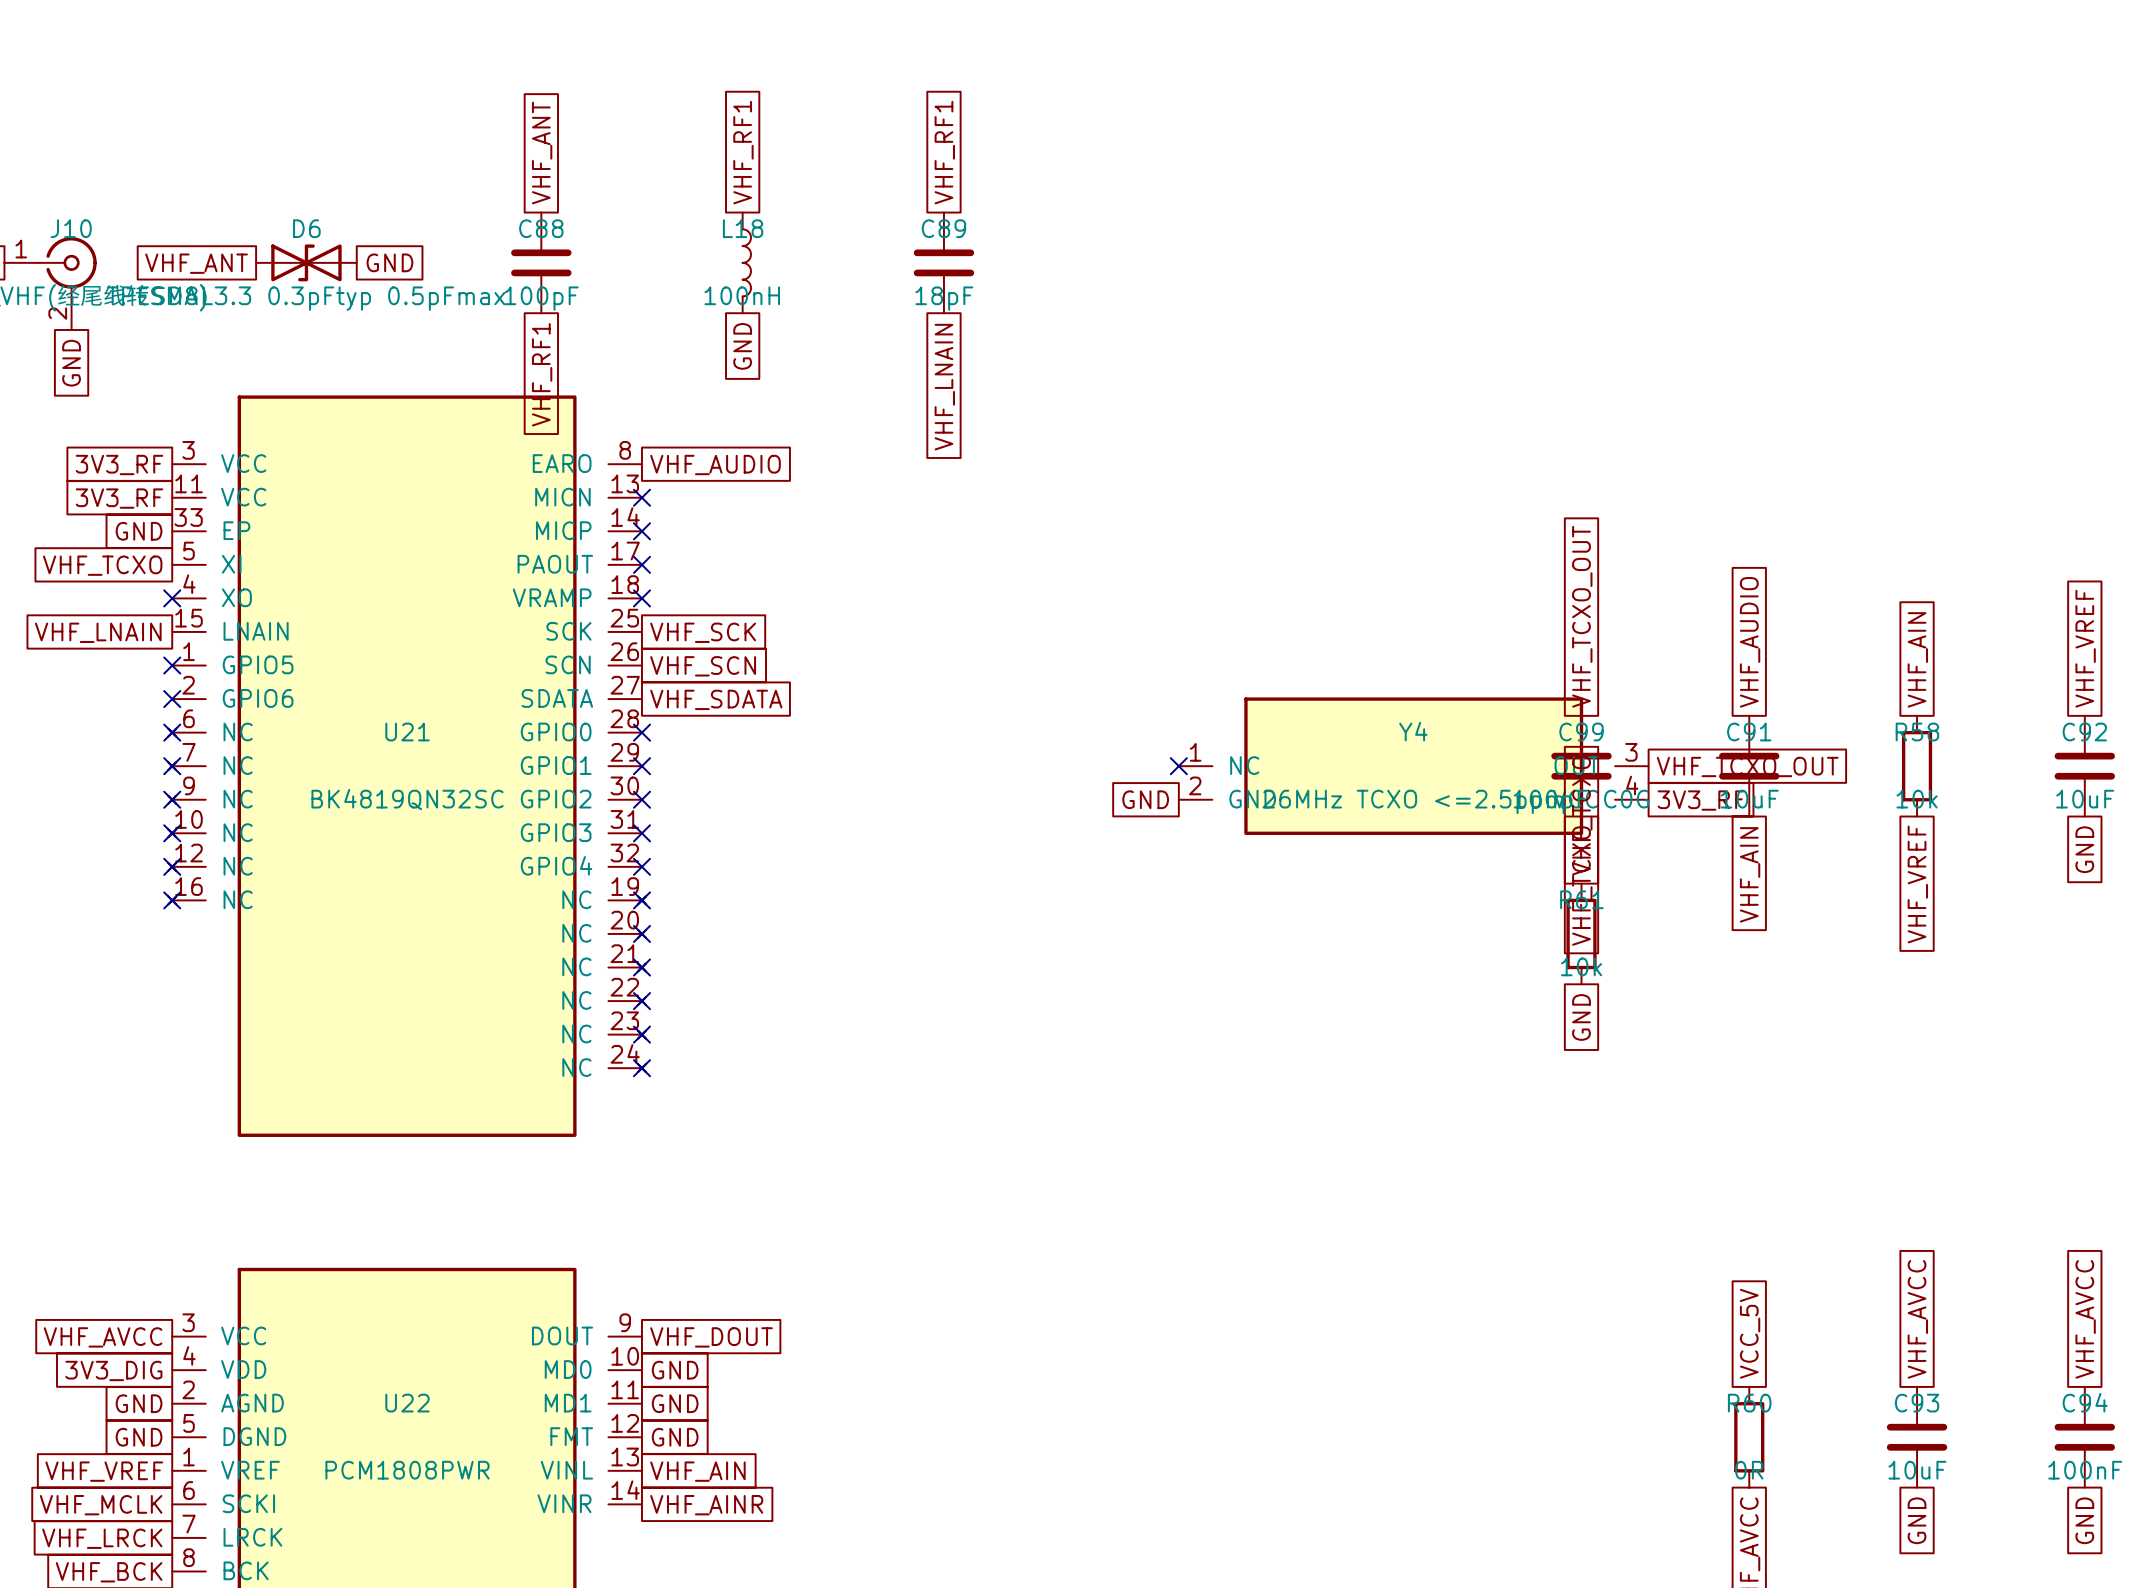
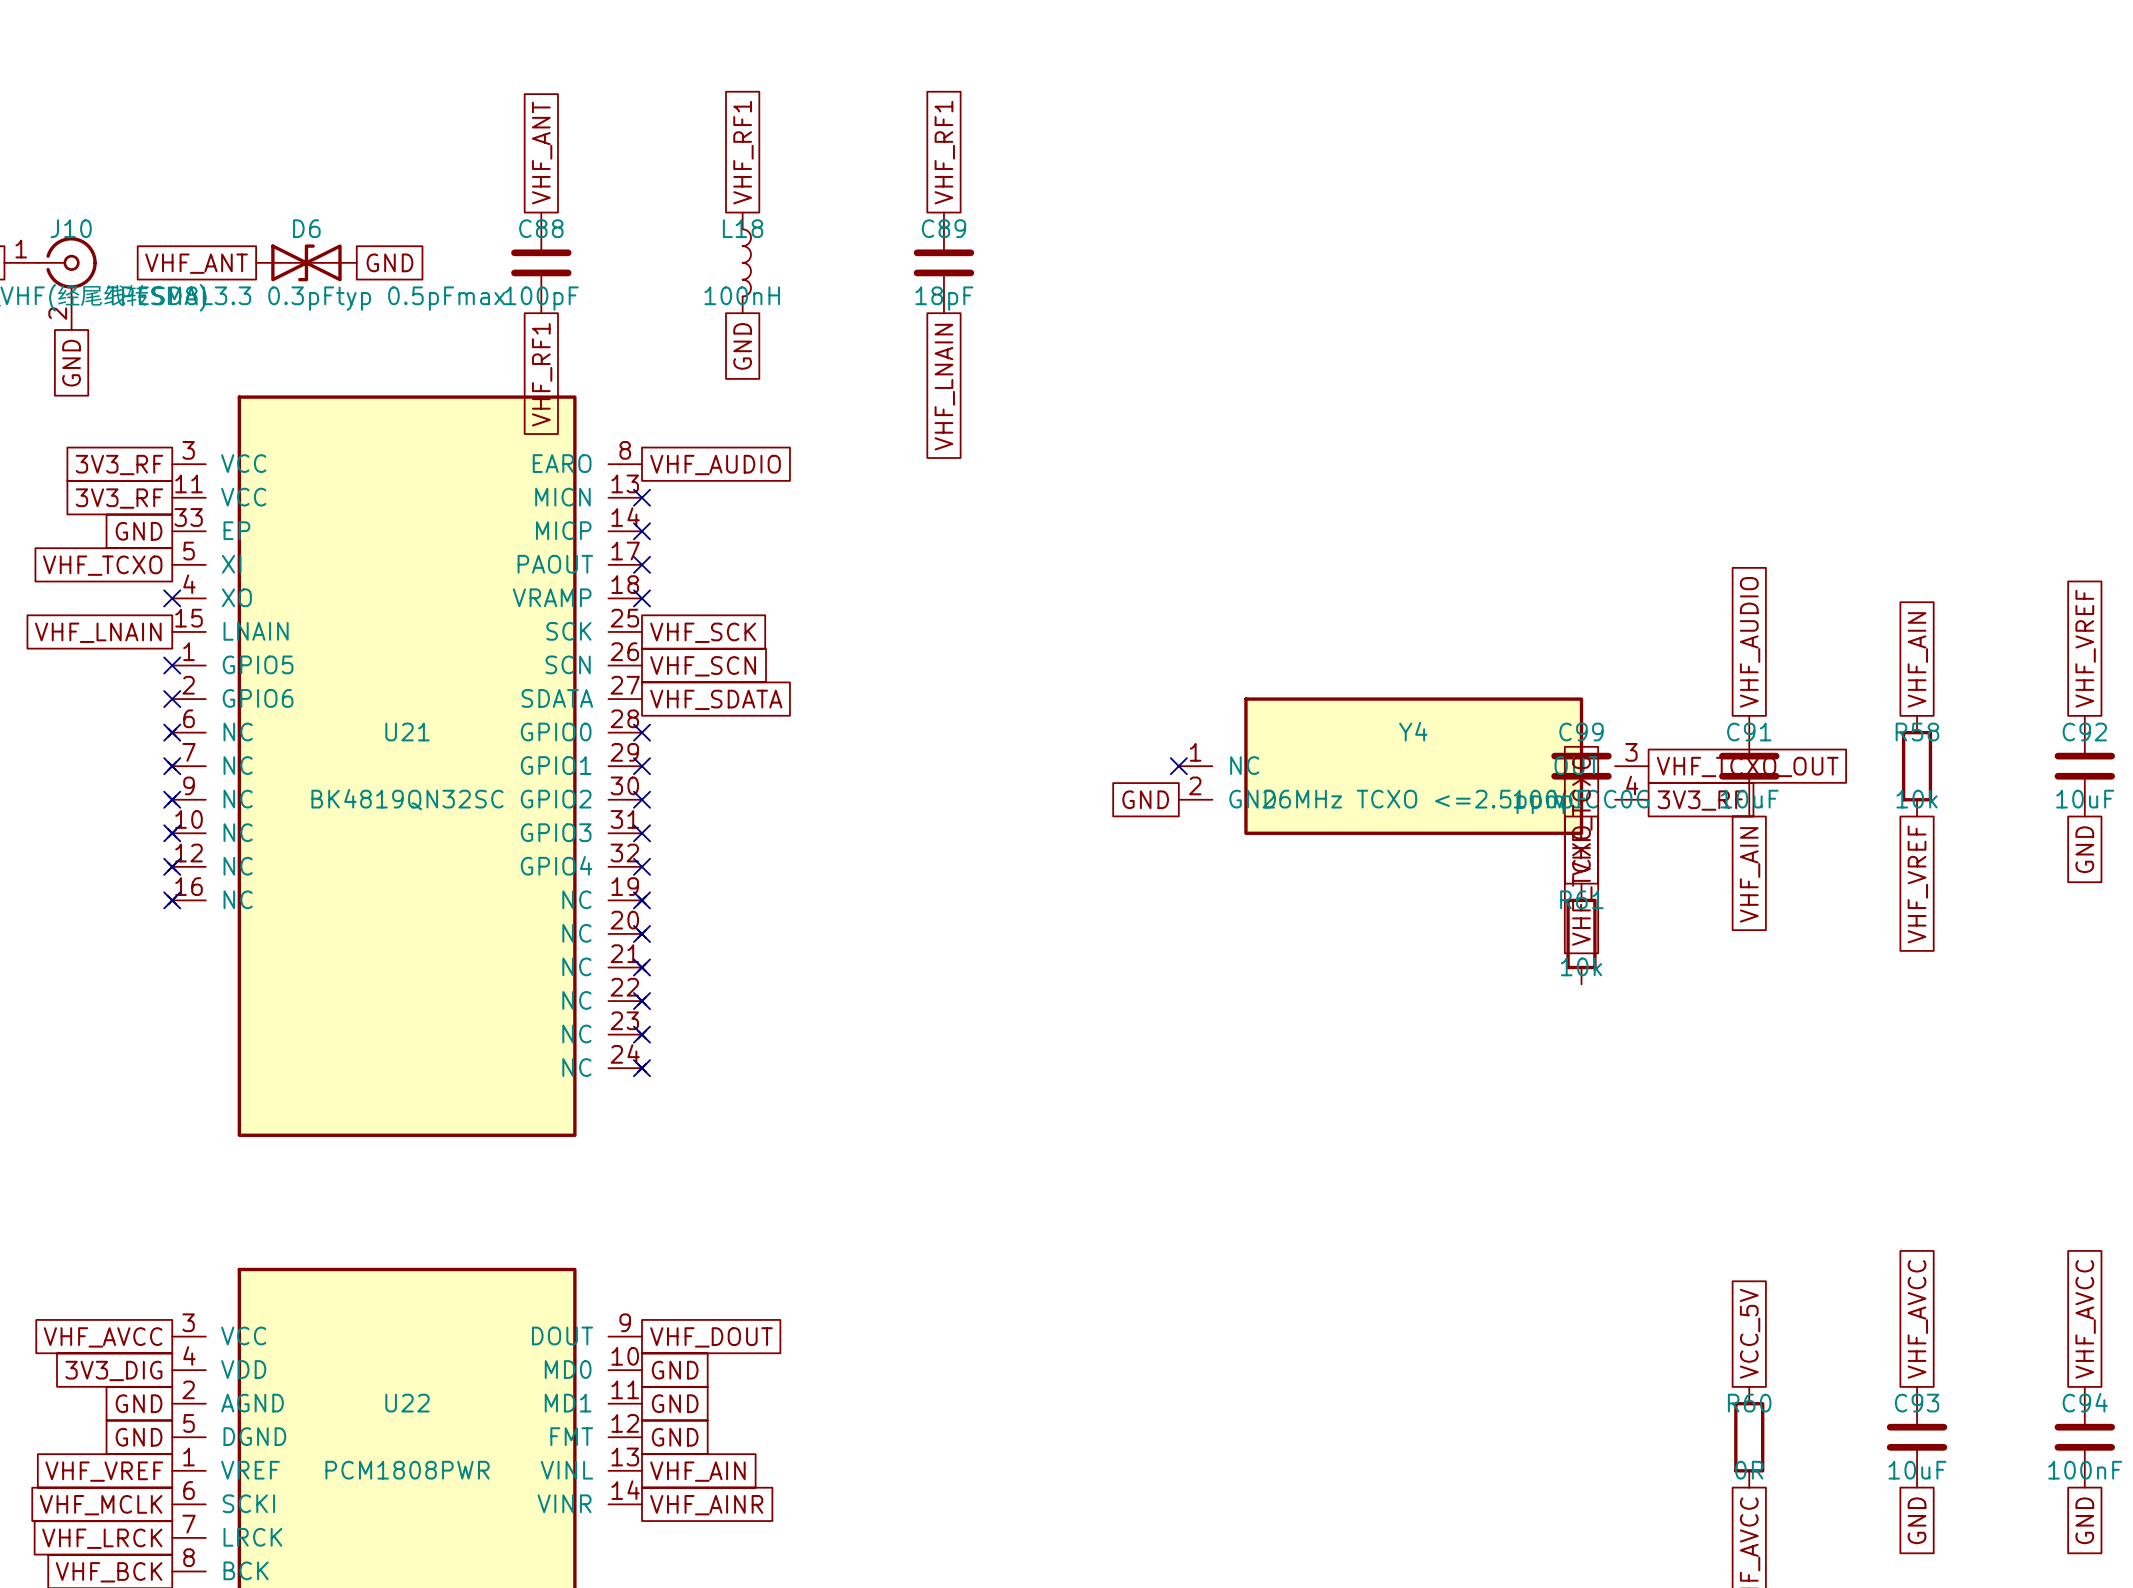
global label: VHF_TCXO_OUT (1582, 616) -> none
global label: GND (1581, 1017) -> none

